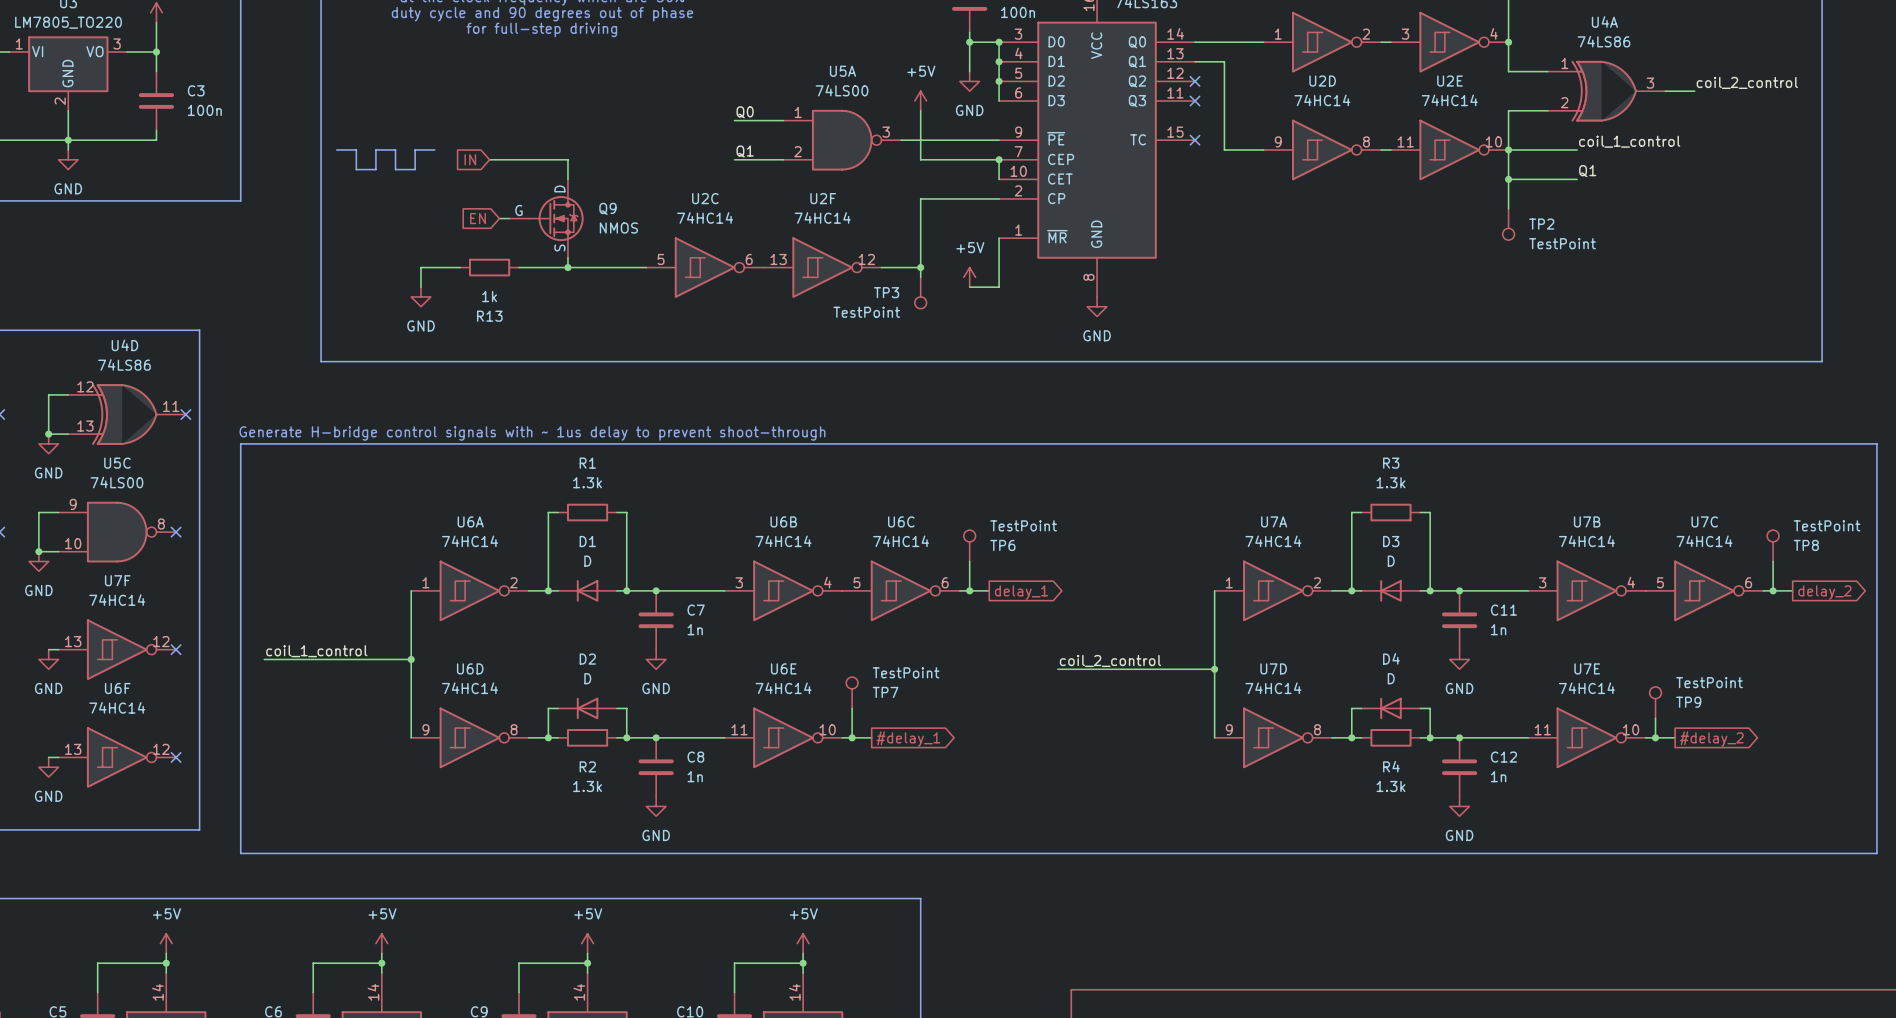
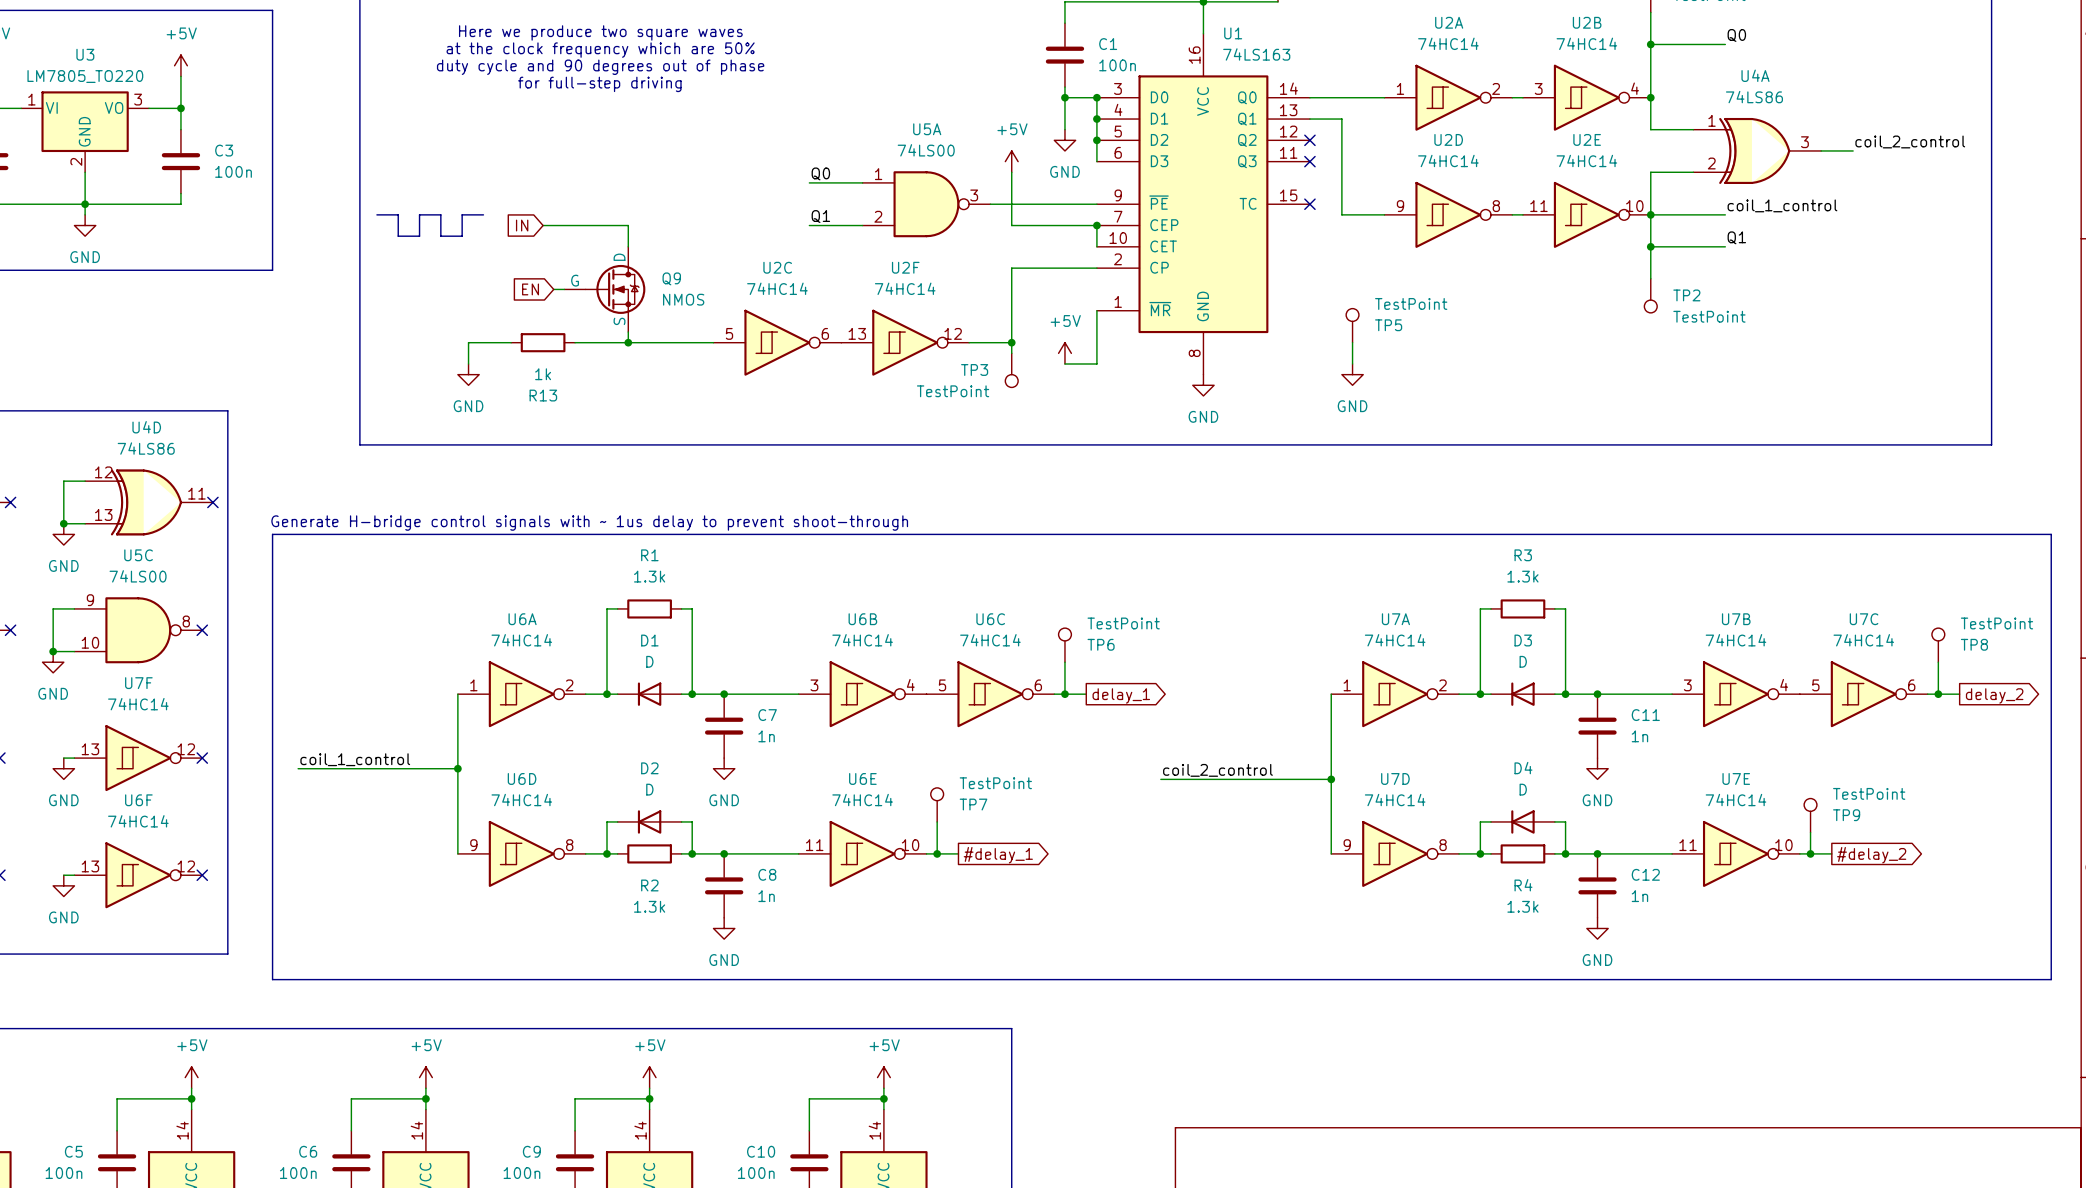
TP5: none -> TestPoint (1352, 325)
wire: none -> (1352, 342) (1352, 363)
power symbol: none -> GND (1352, 374)

